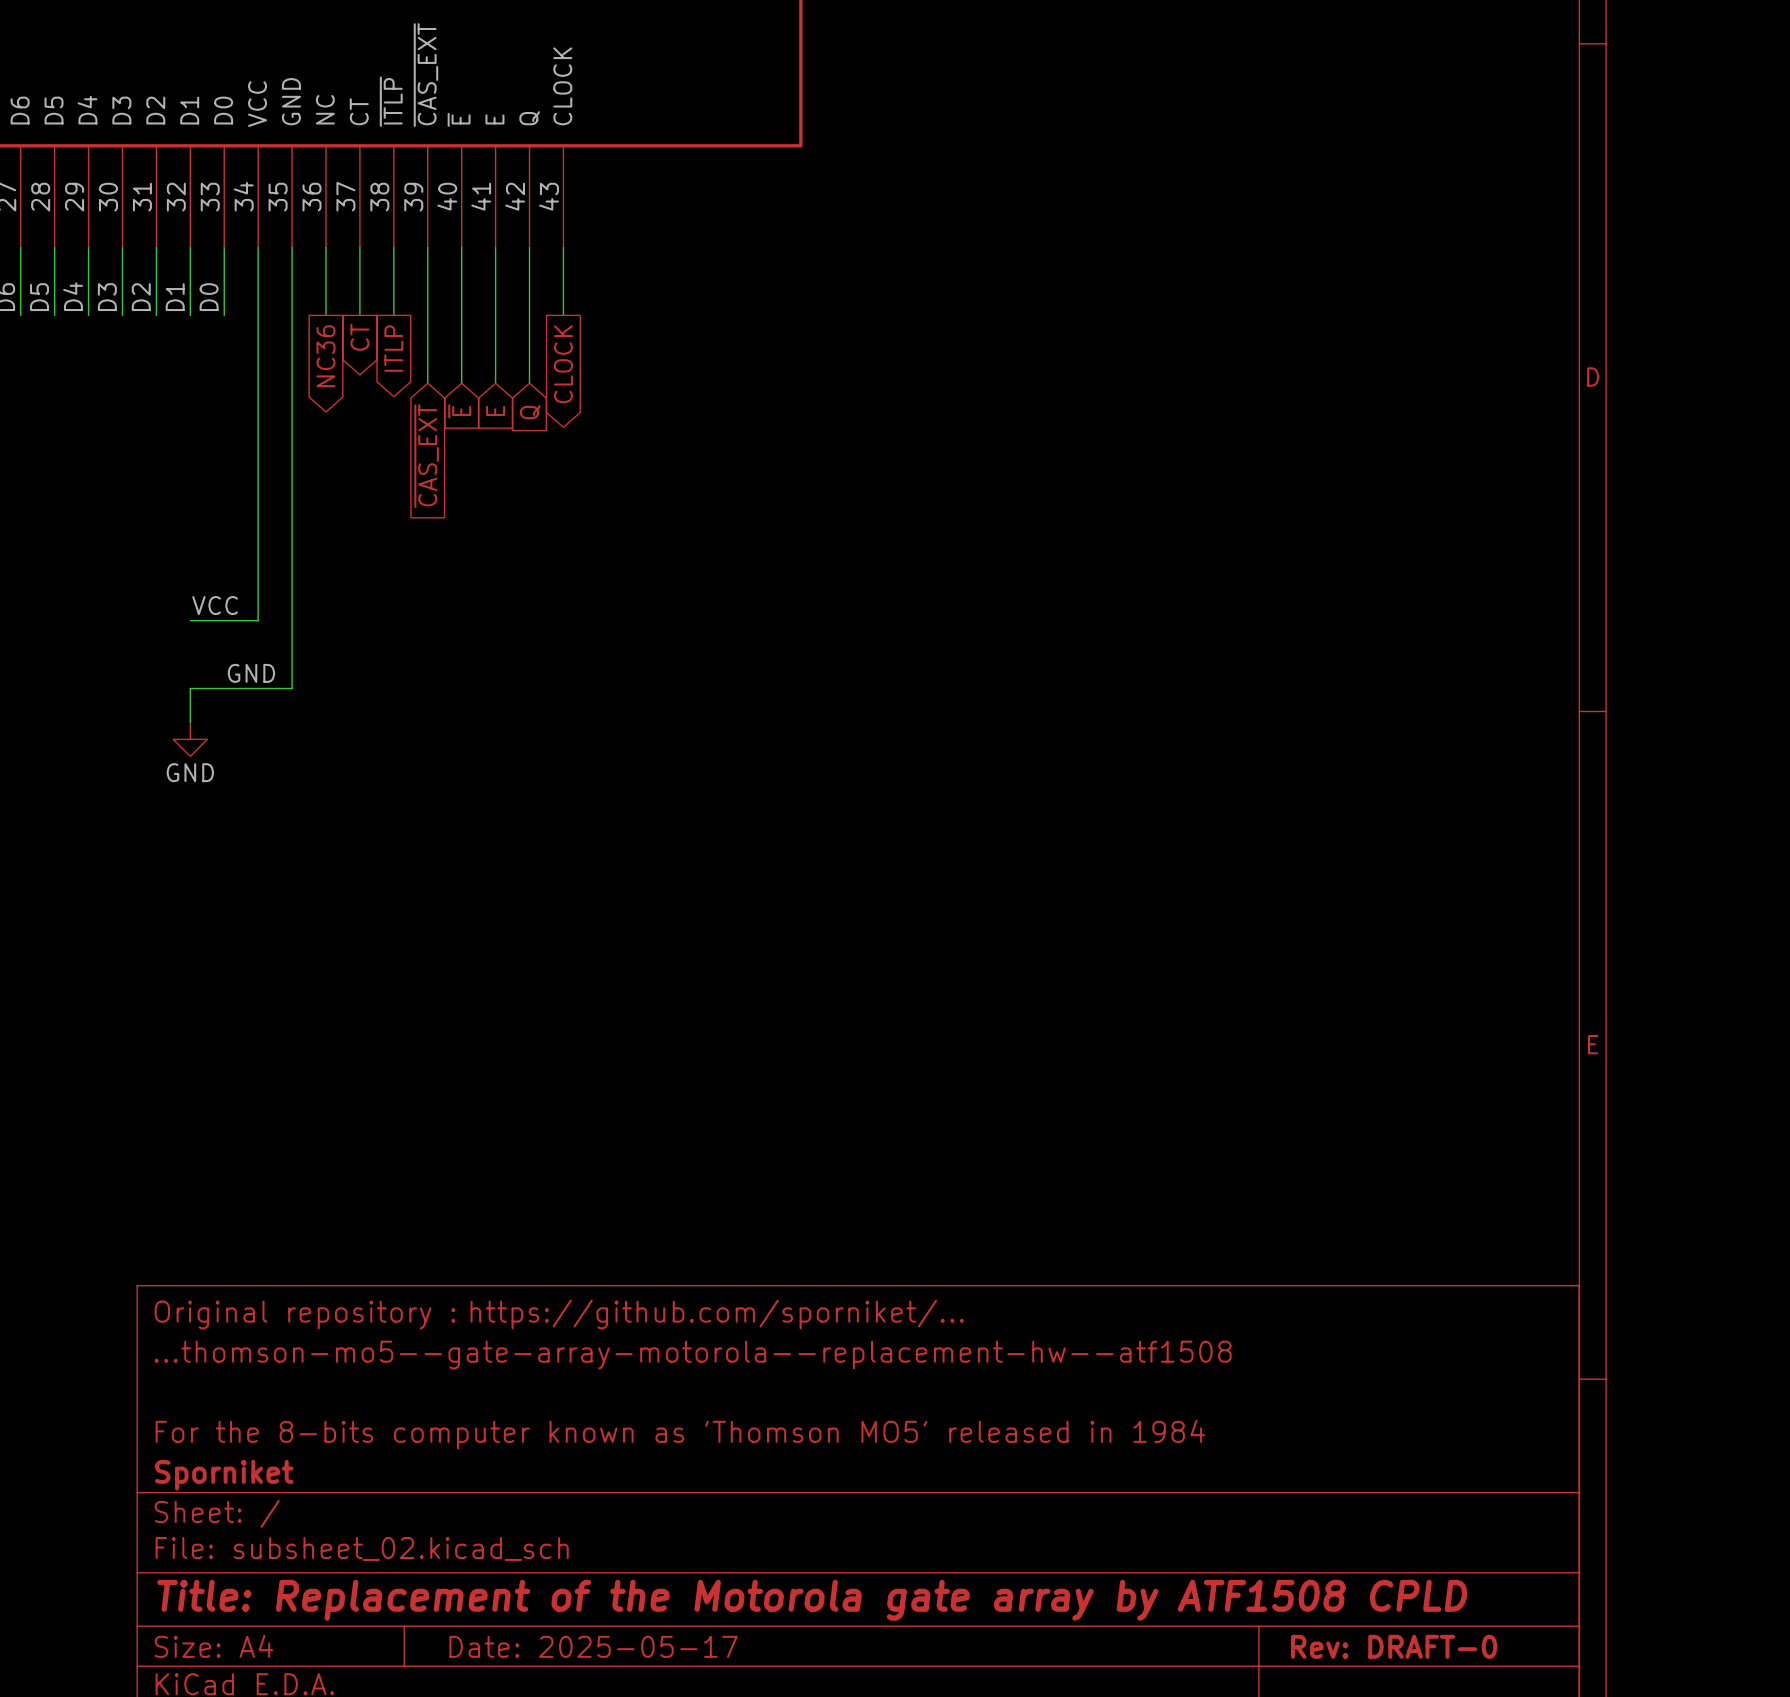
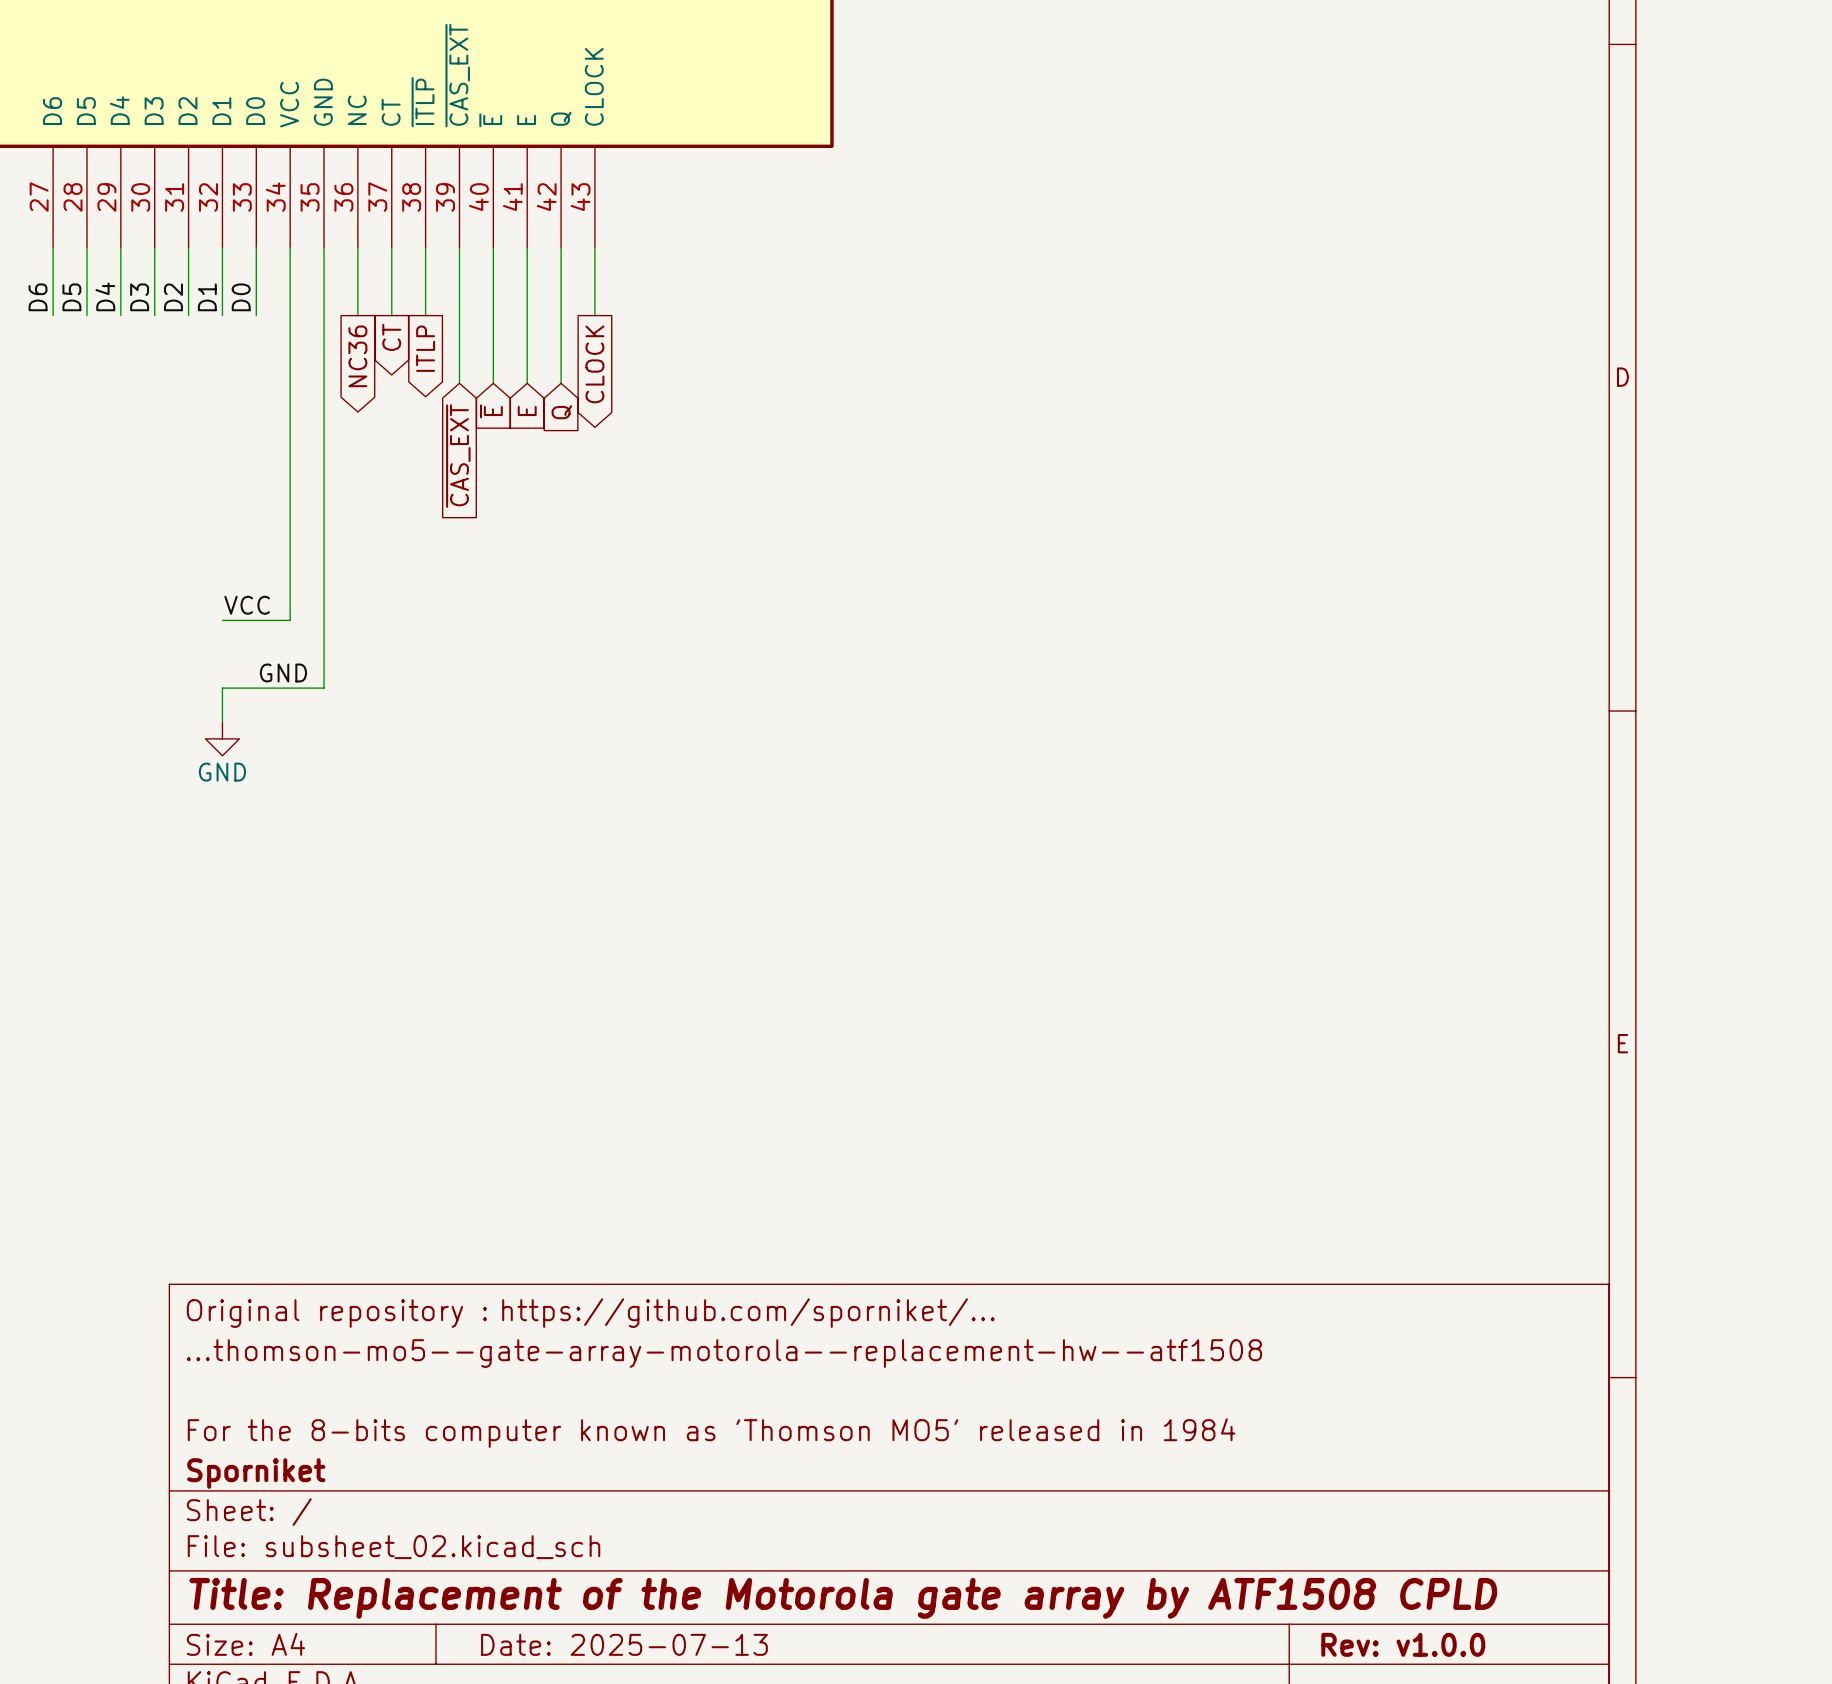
title block: Date: 2025-05-17 (593, 1646) -> Date: 2025-07-13 (624, 1644)
title block: Rev: DRAFT-0 (1394, 1646) -> Rev: v1.0.0 (1403, 1644)

